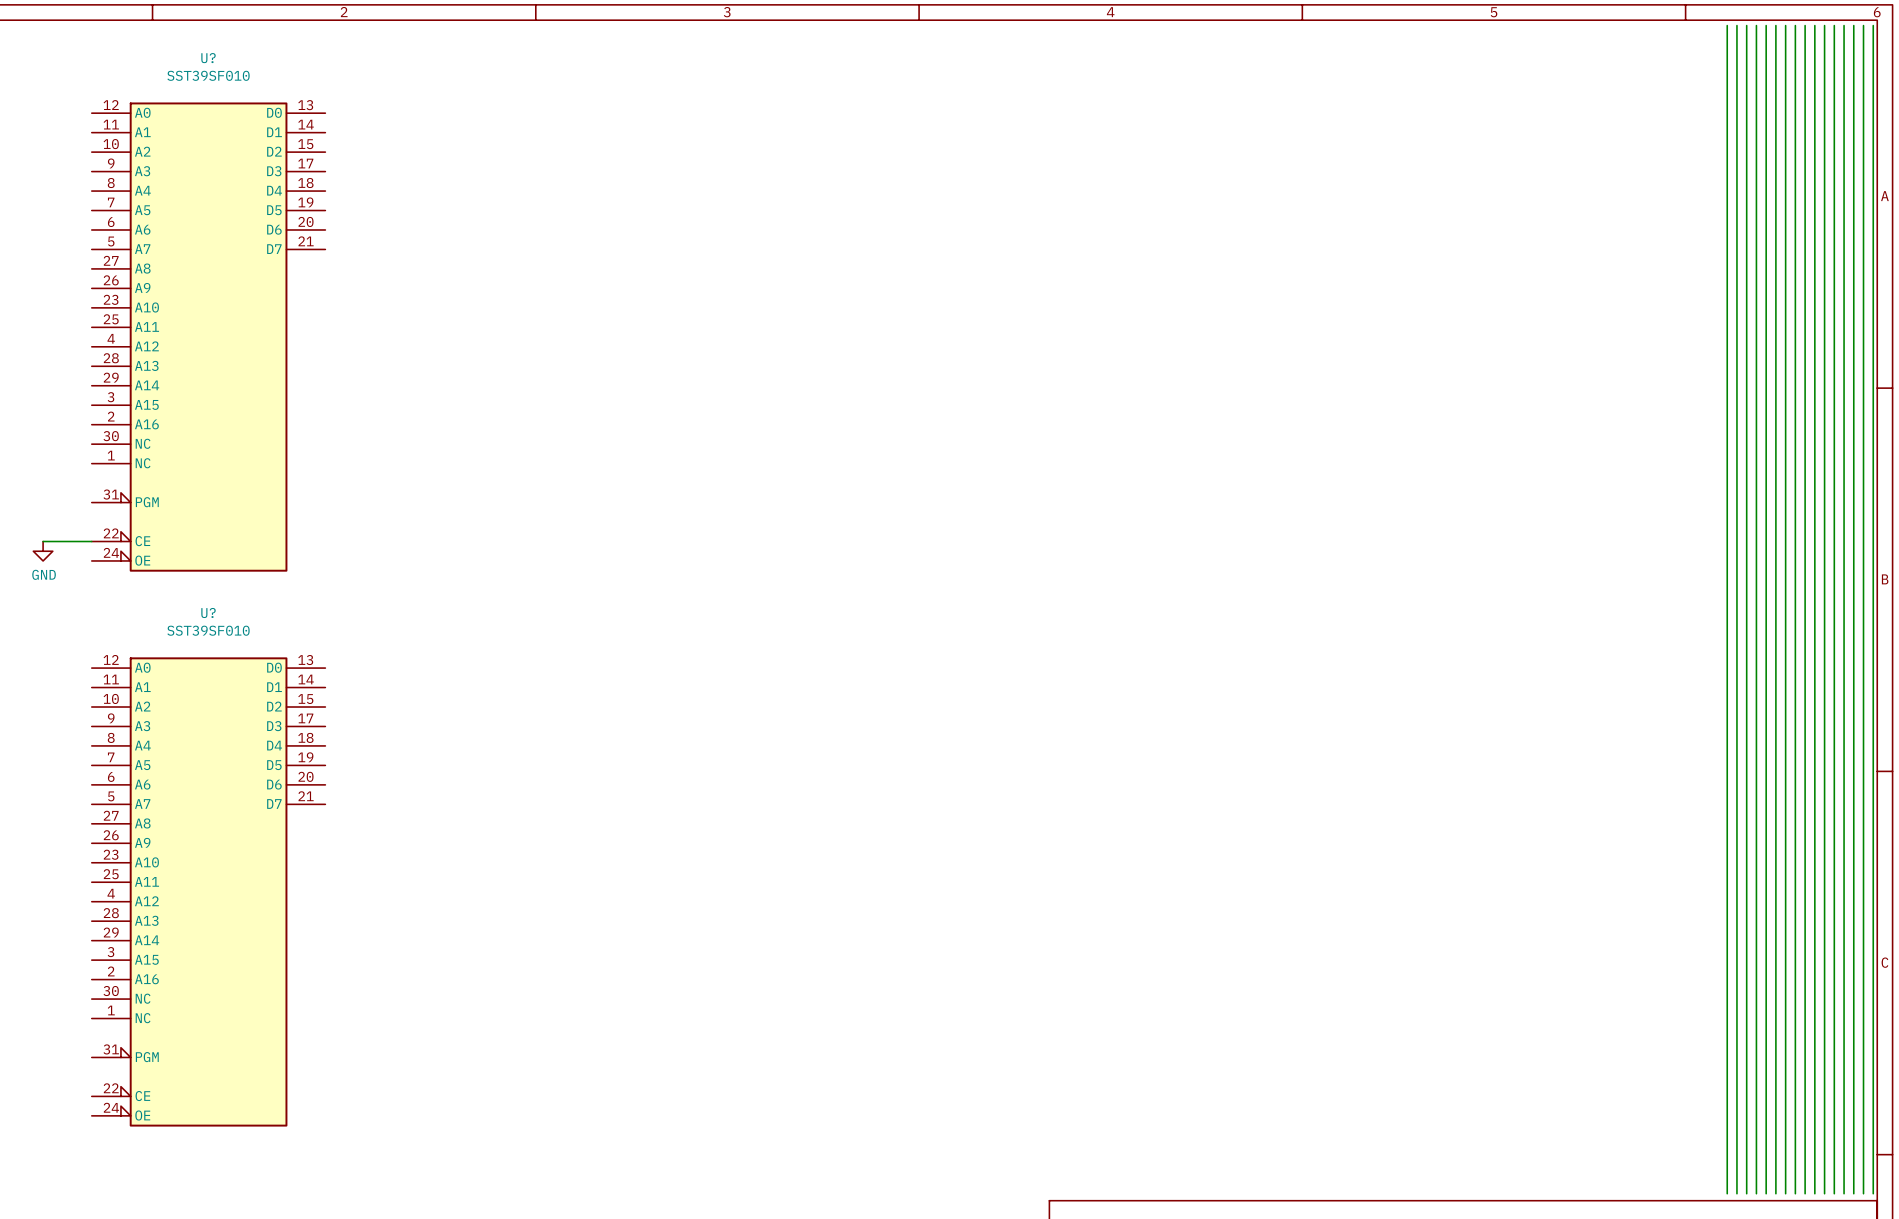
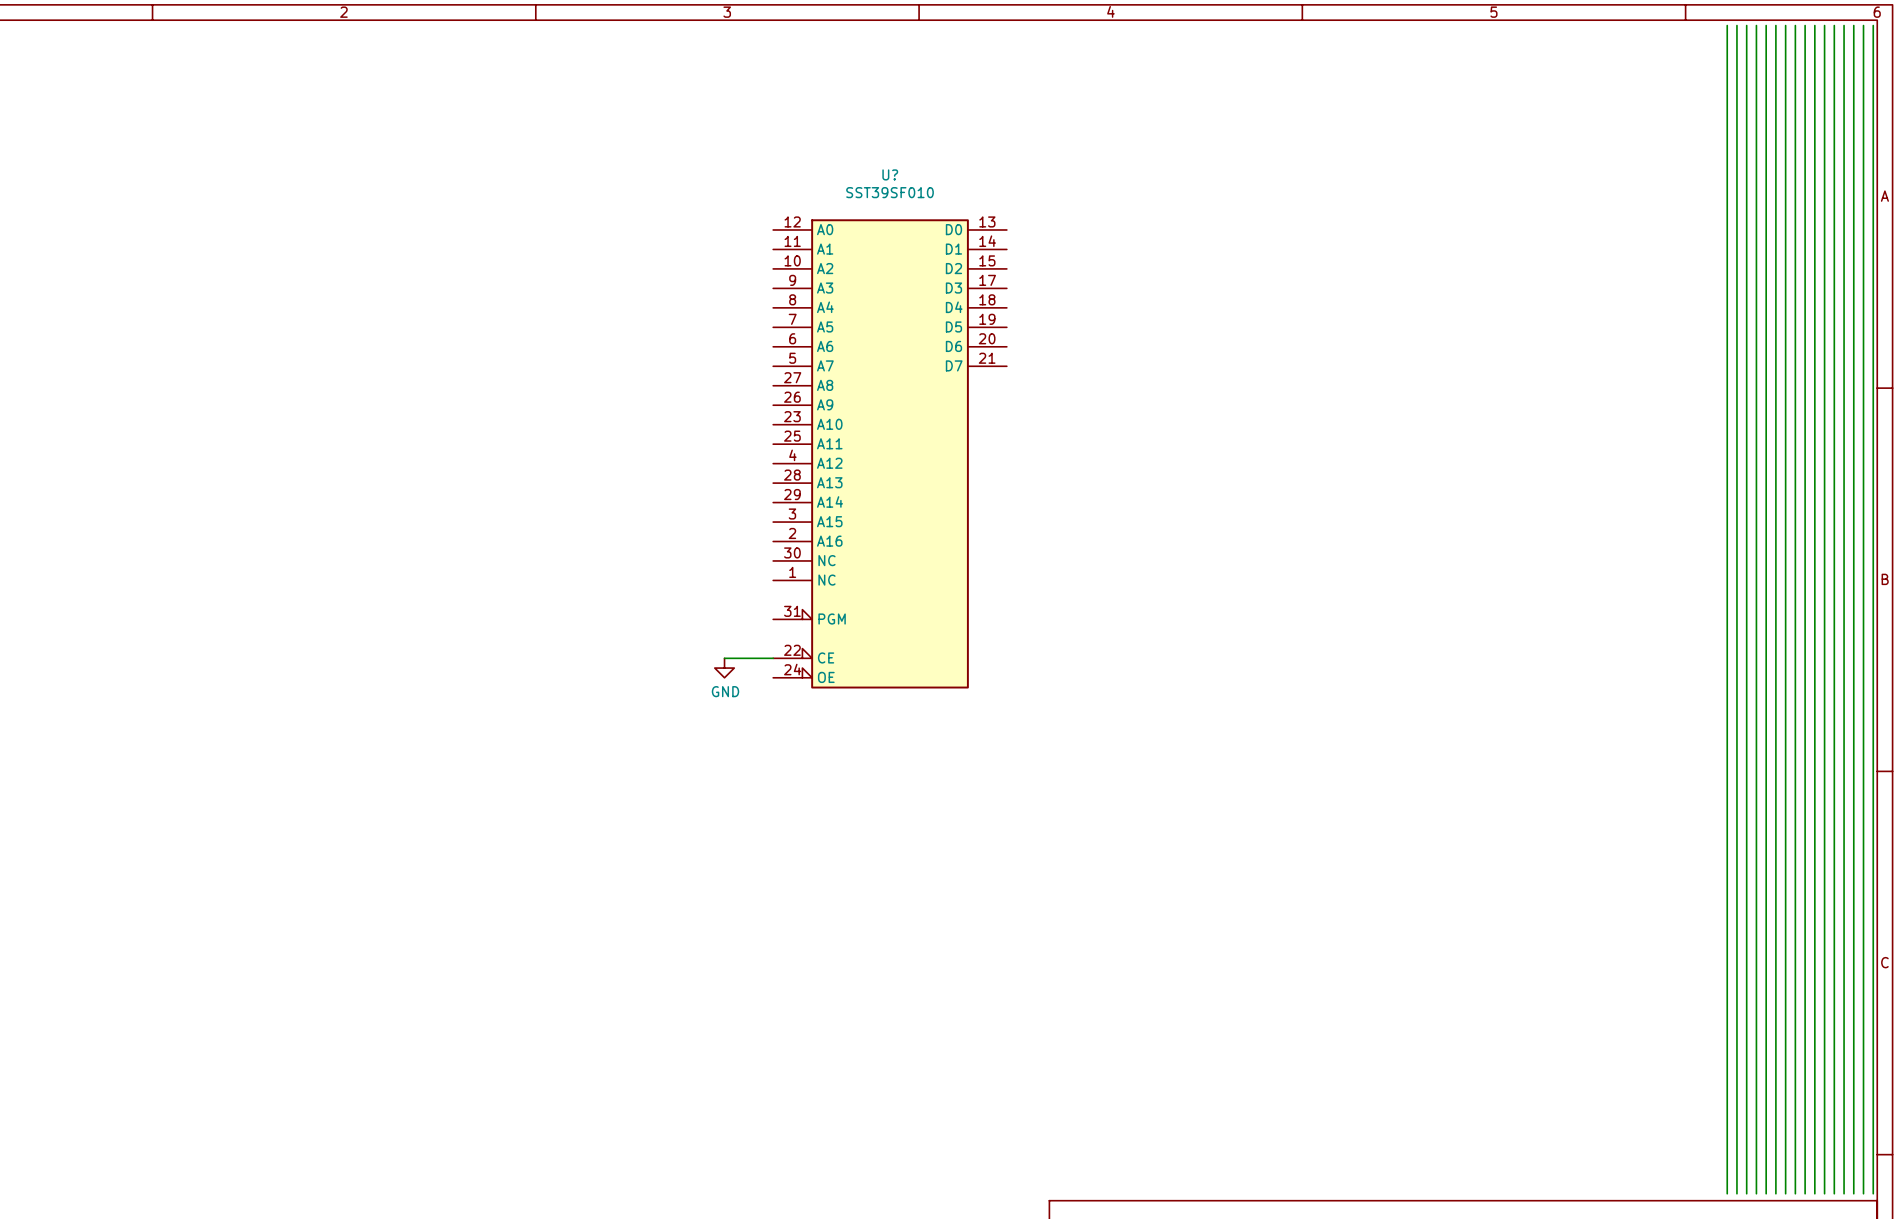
U?: SST39SF010 (208, 337) -> none
U?: none -> SST39SF010 (890, 453)
wire: (43, 541) (91, 541) -> none
power symbol: GND (43, 551) -> none
wire: none -> (724, 658) (773, 658)
power symbol: none -> GND (724, 668)
U?: SST39SF010 (208, 891) -> none

